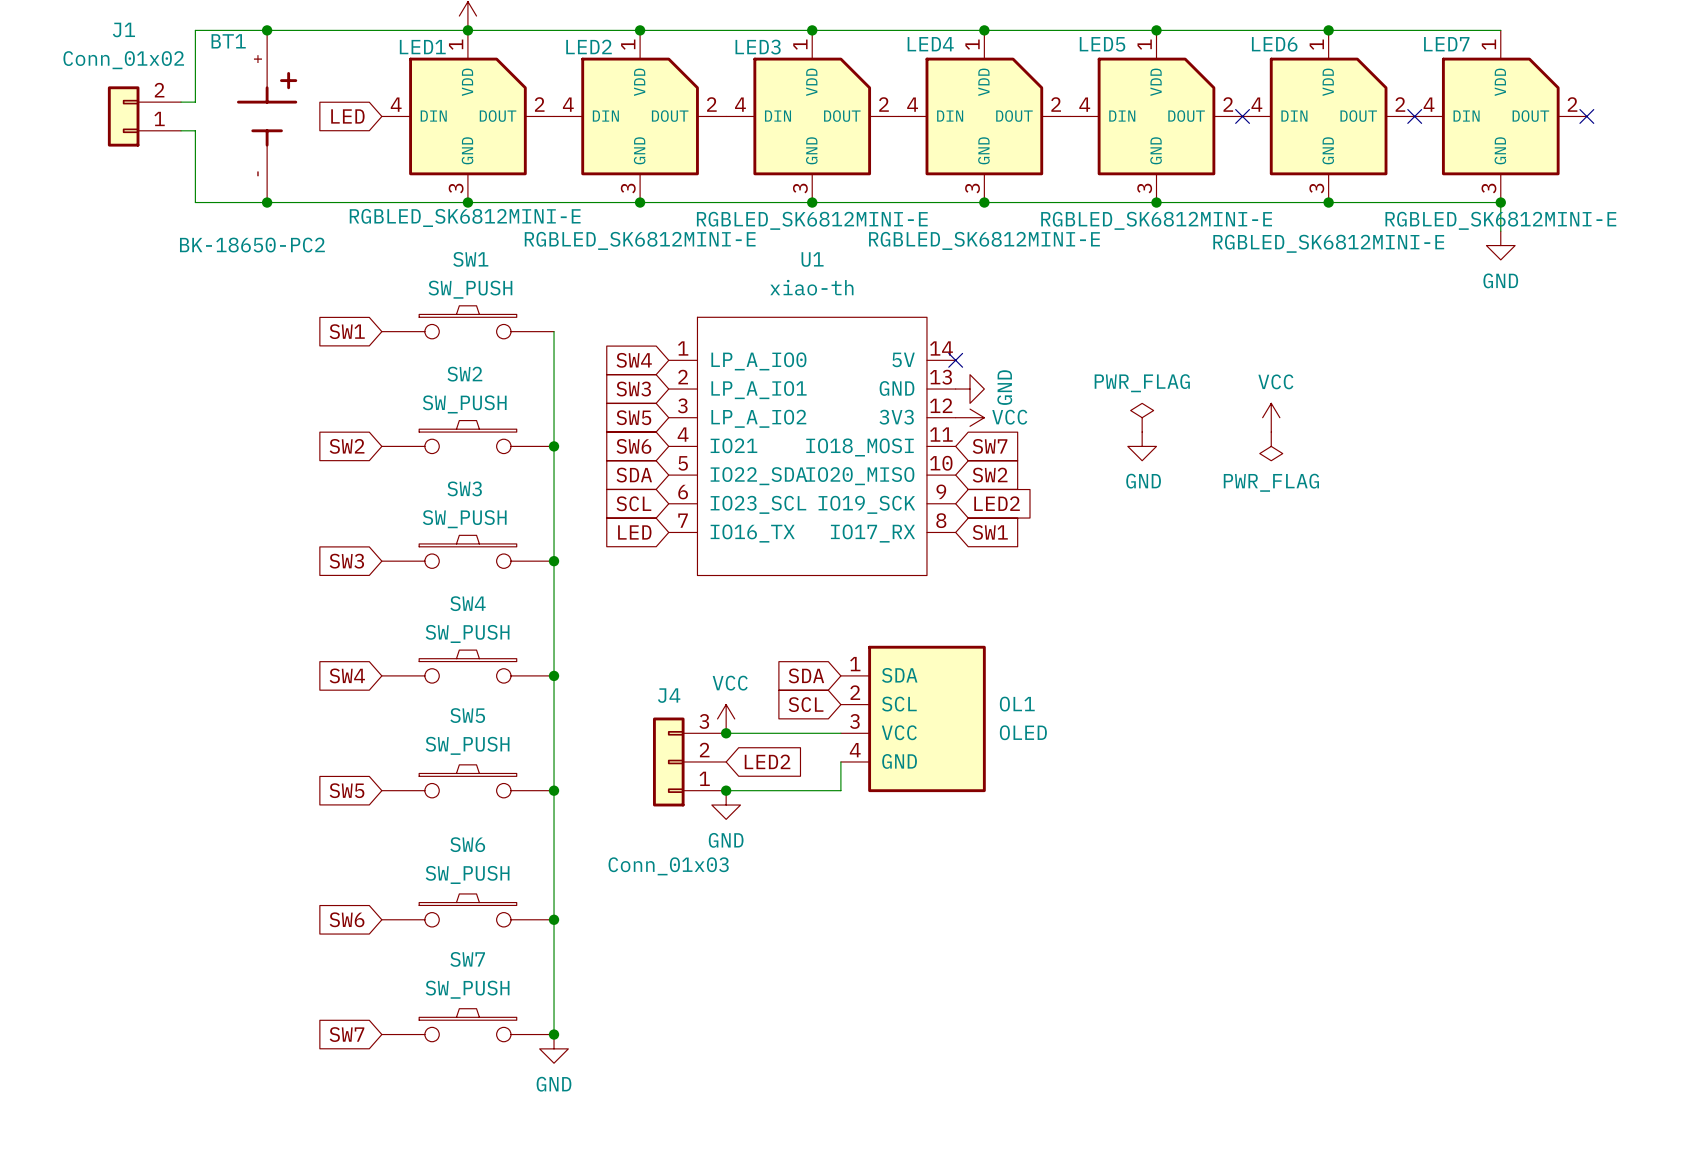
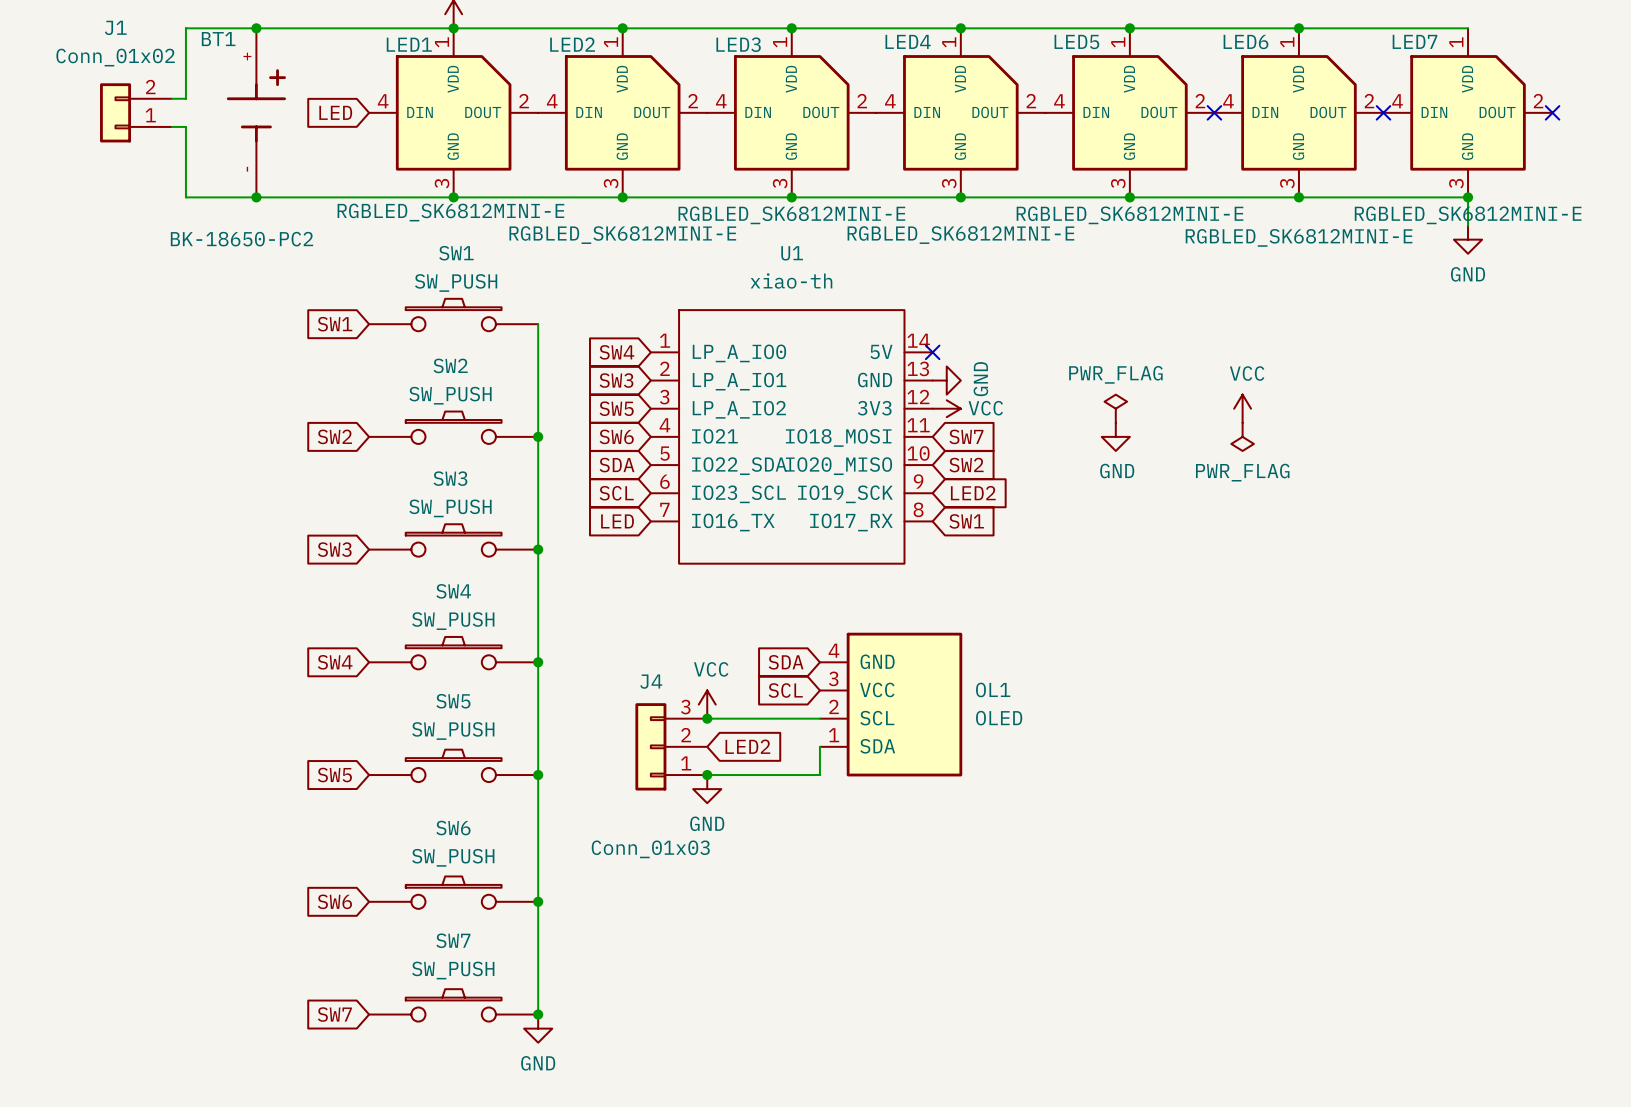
OL1 flip: as is (926, 718) -> up-down (904, 704)

